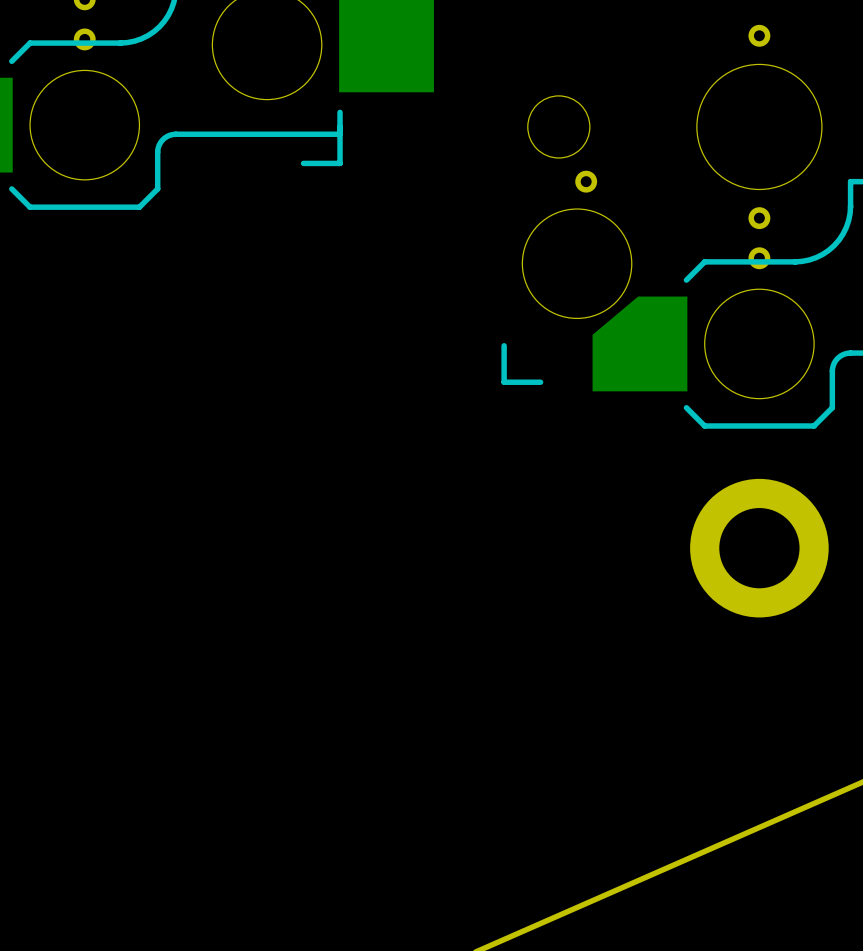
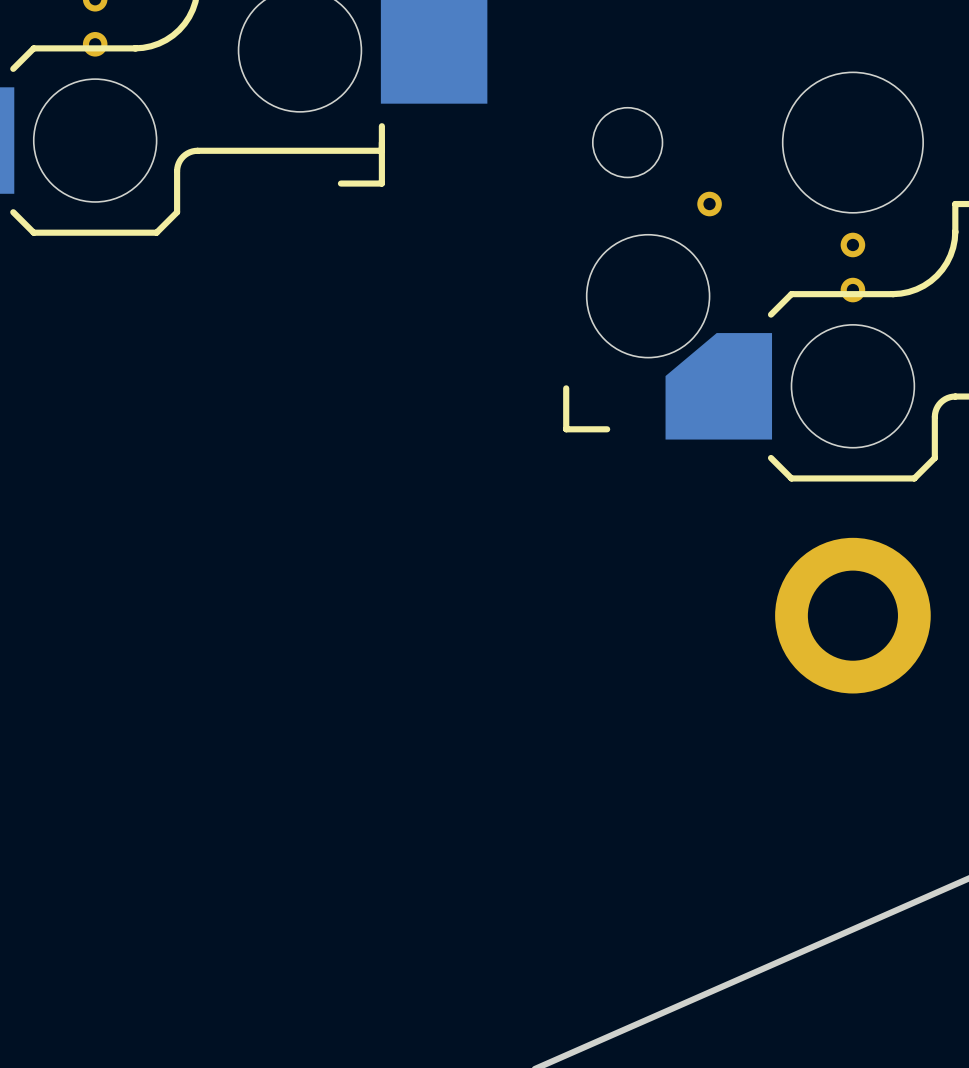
part: (759, 35) -> none
part position: (586, 181) -> (709, 204)

